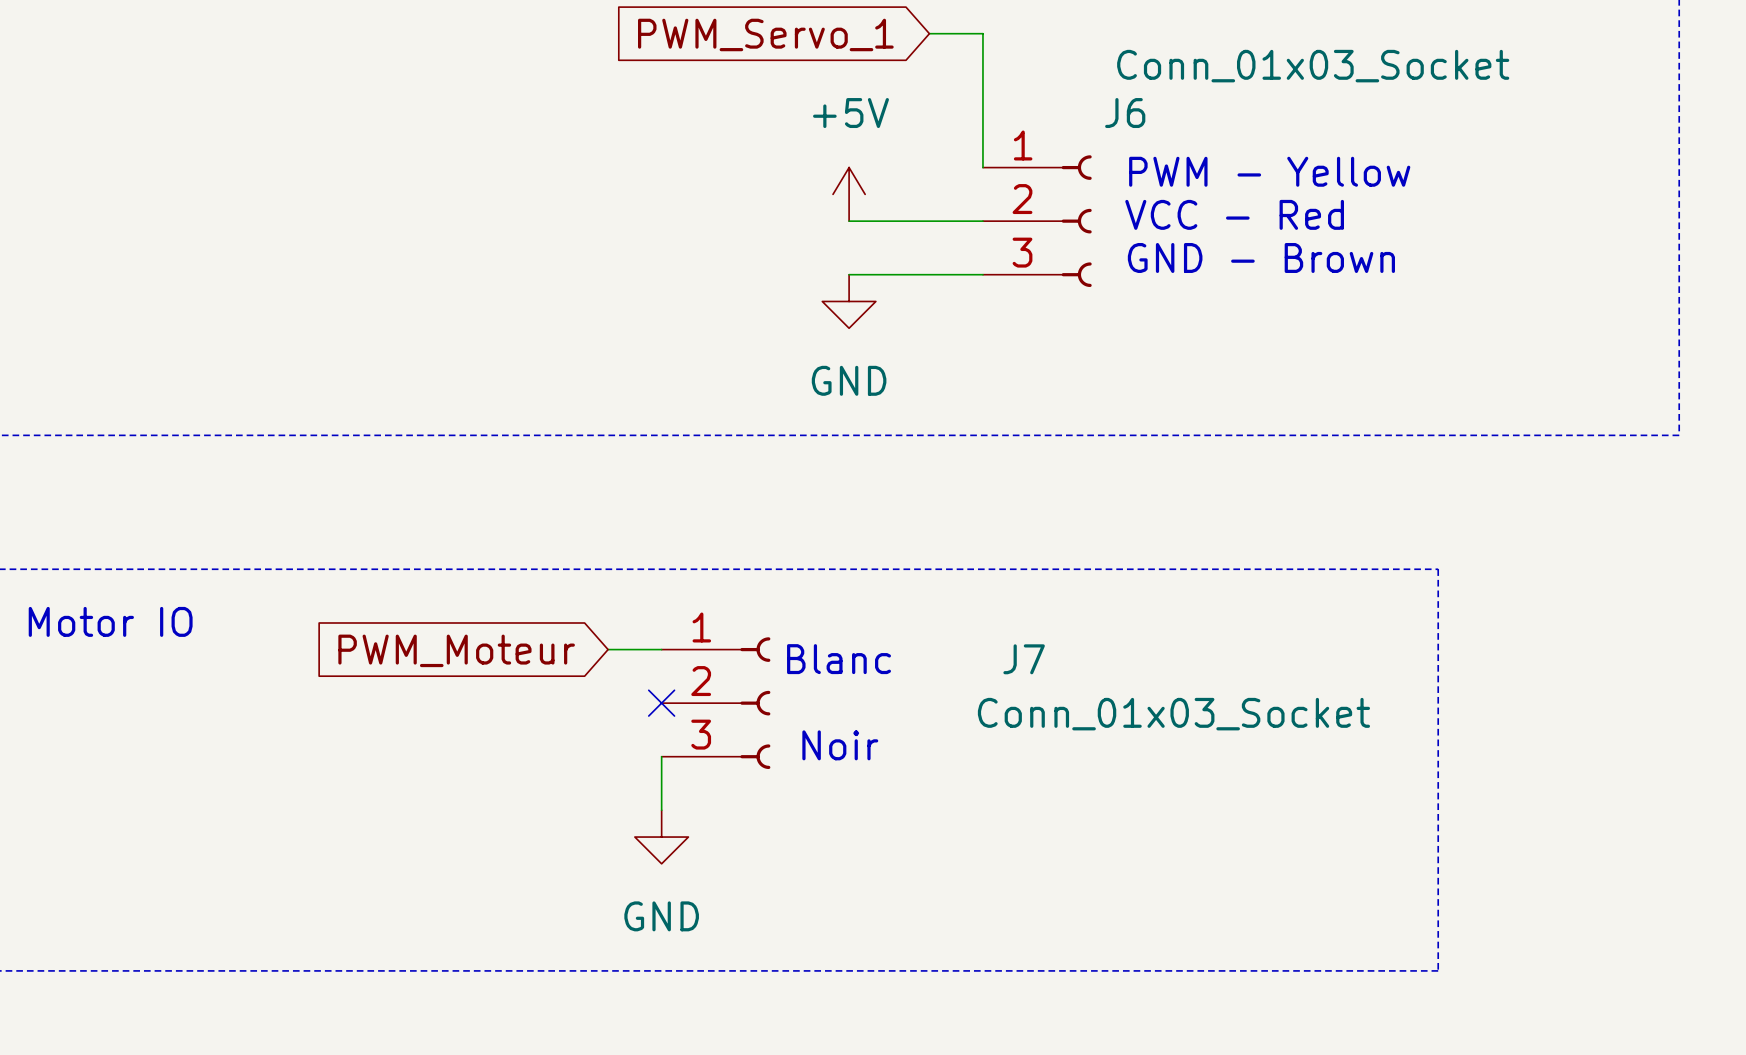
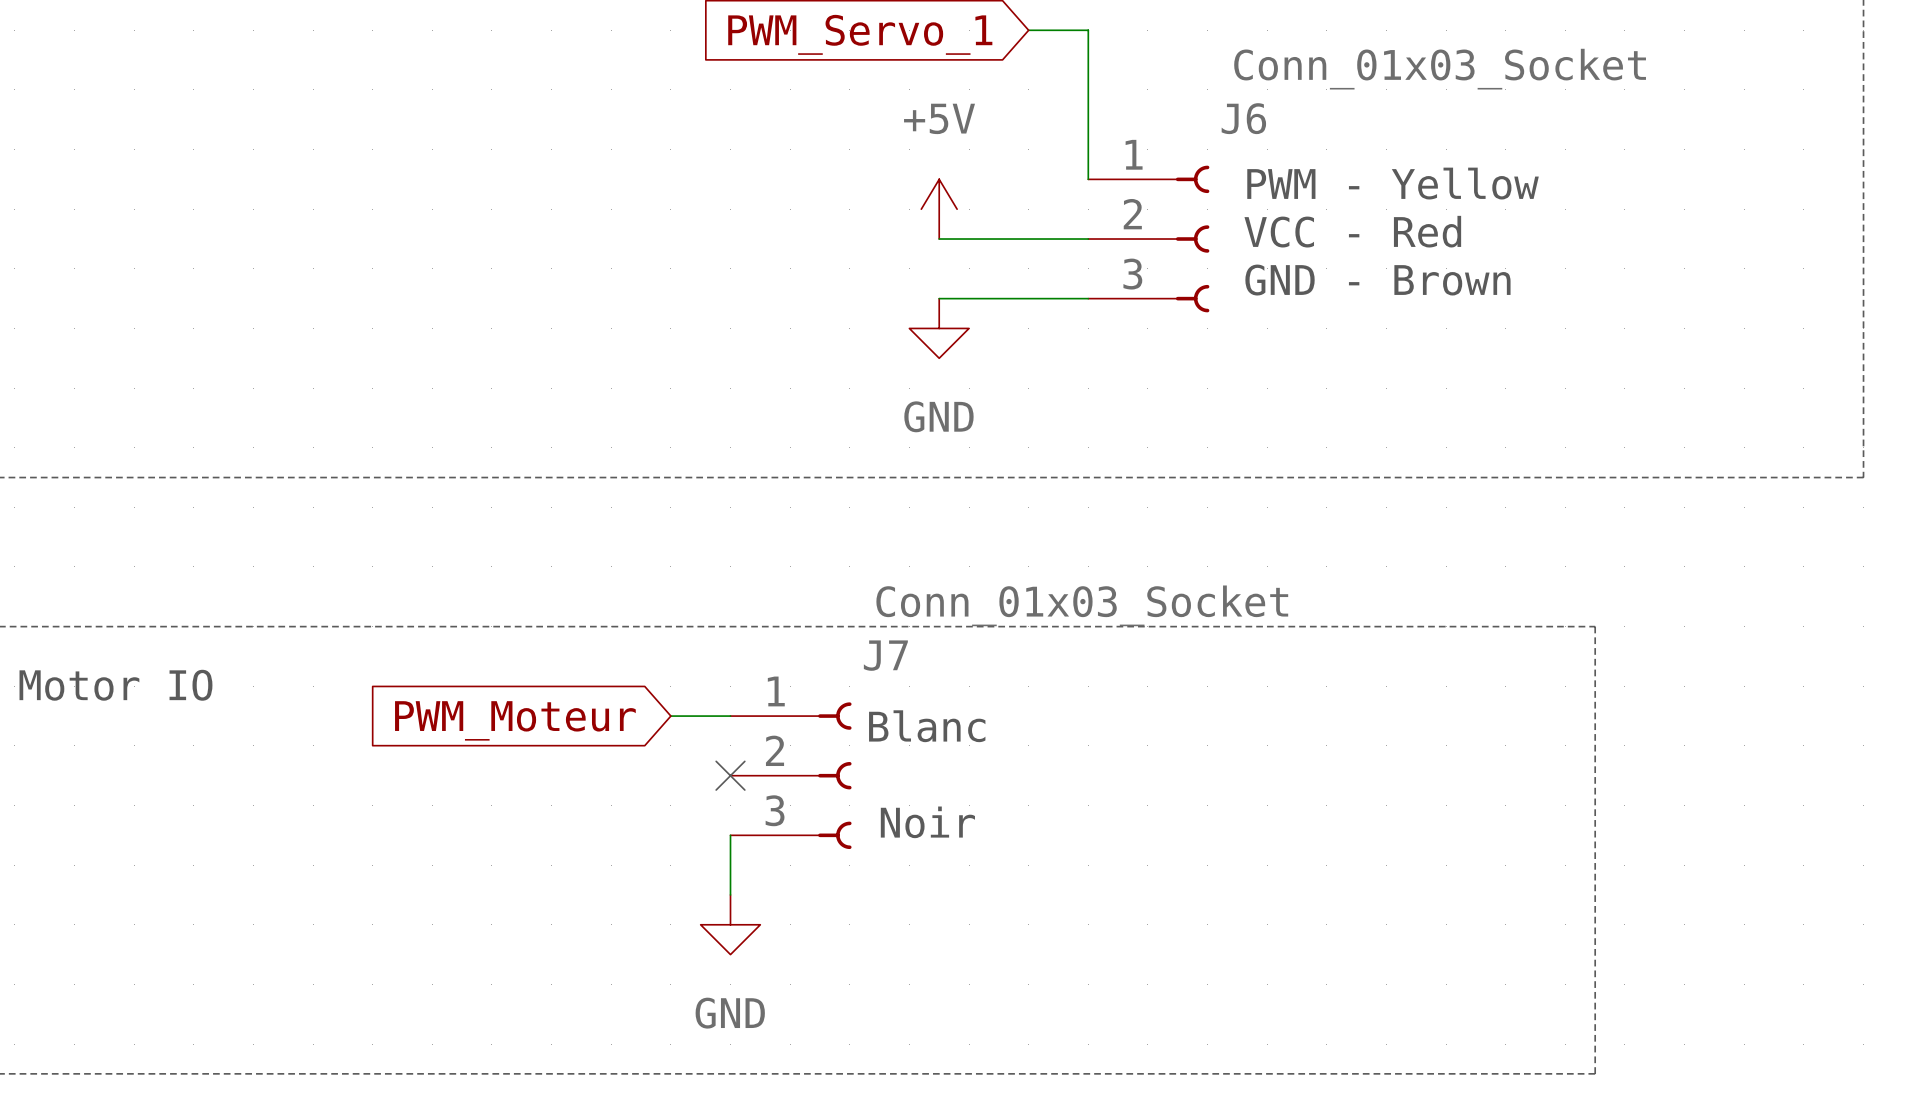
J7 name position: J7 (1024, 659) -> J7 (885, 655)
J7 value position: Conn_01x03_Socket (1173, 714) -> Conn_01x03_Socket (1082, 605)

